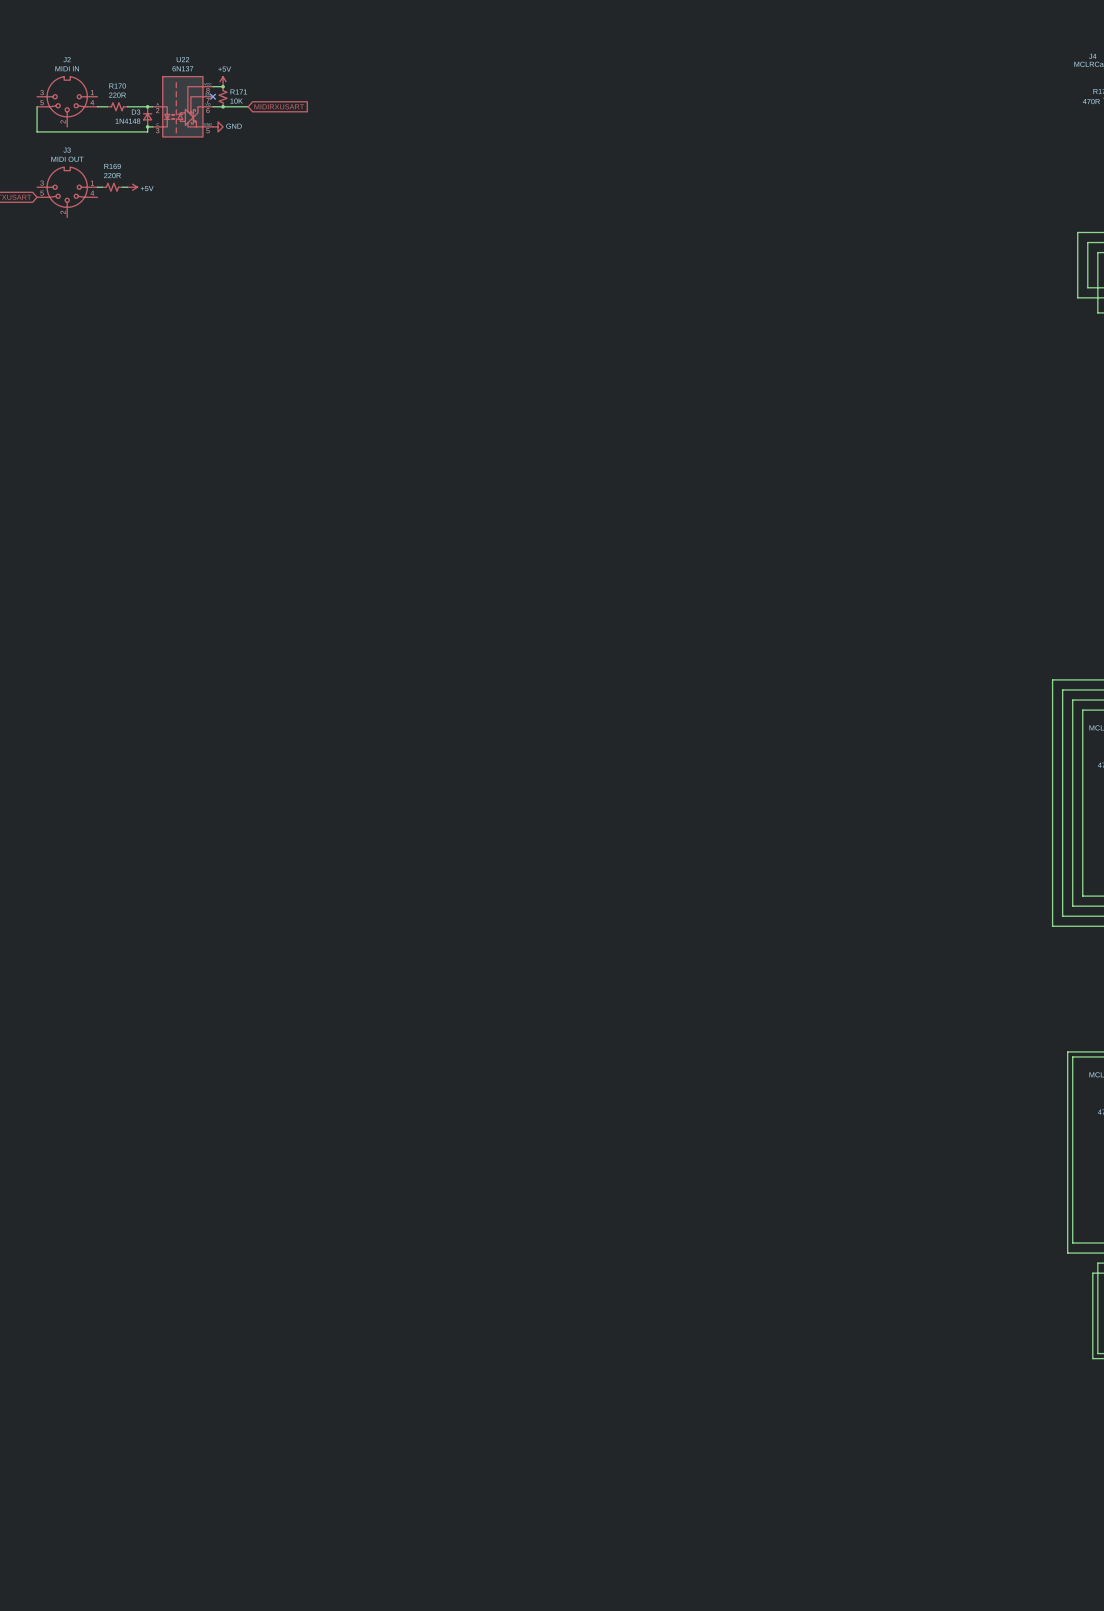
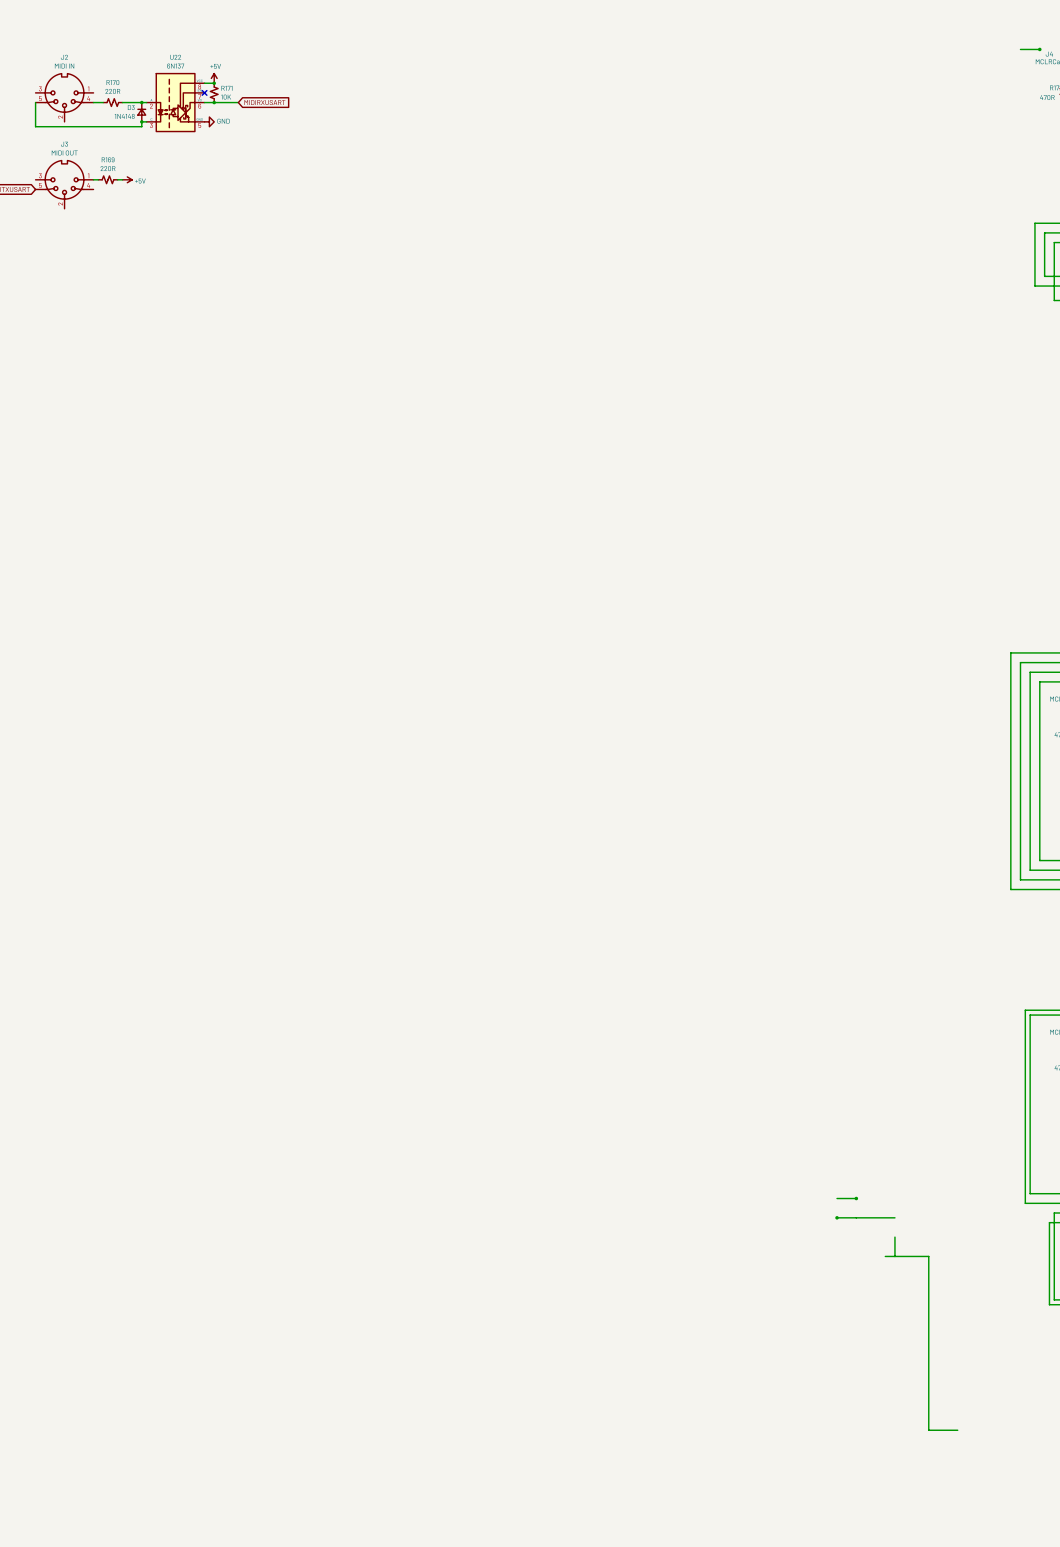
wire: none -> (1020, 49) (1039, 49)
junction: none -> (1039, 49)
wire: none -> (837, 1198) (856, 1198)
junction: none -> (856, 1198)
wire: none -> (837, 1217) (894, 1217)
junction: none -> (837, 1217)
wire: none -> (894, 1237) (894, 1256)
wire: none -> (885, 1256) (928, 1256) (928, 1430) (957, 1430)

